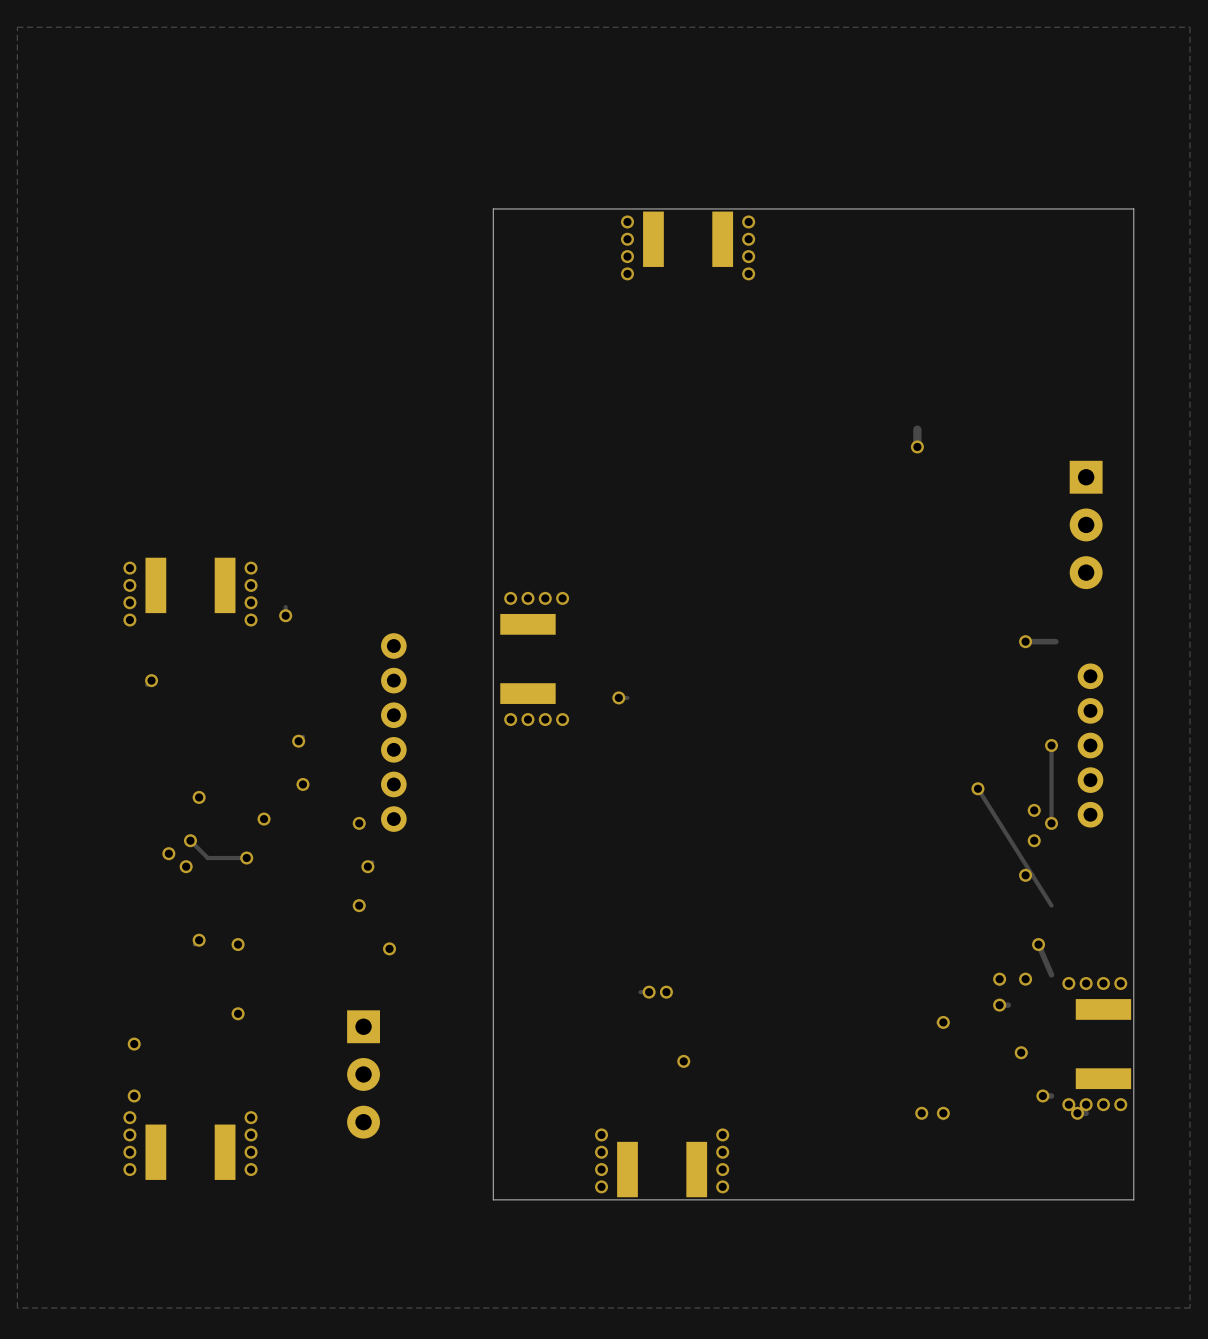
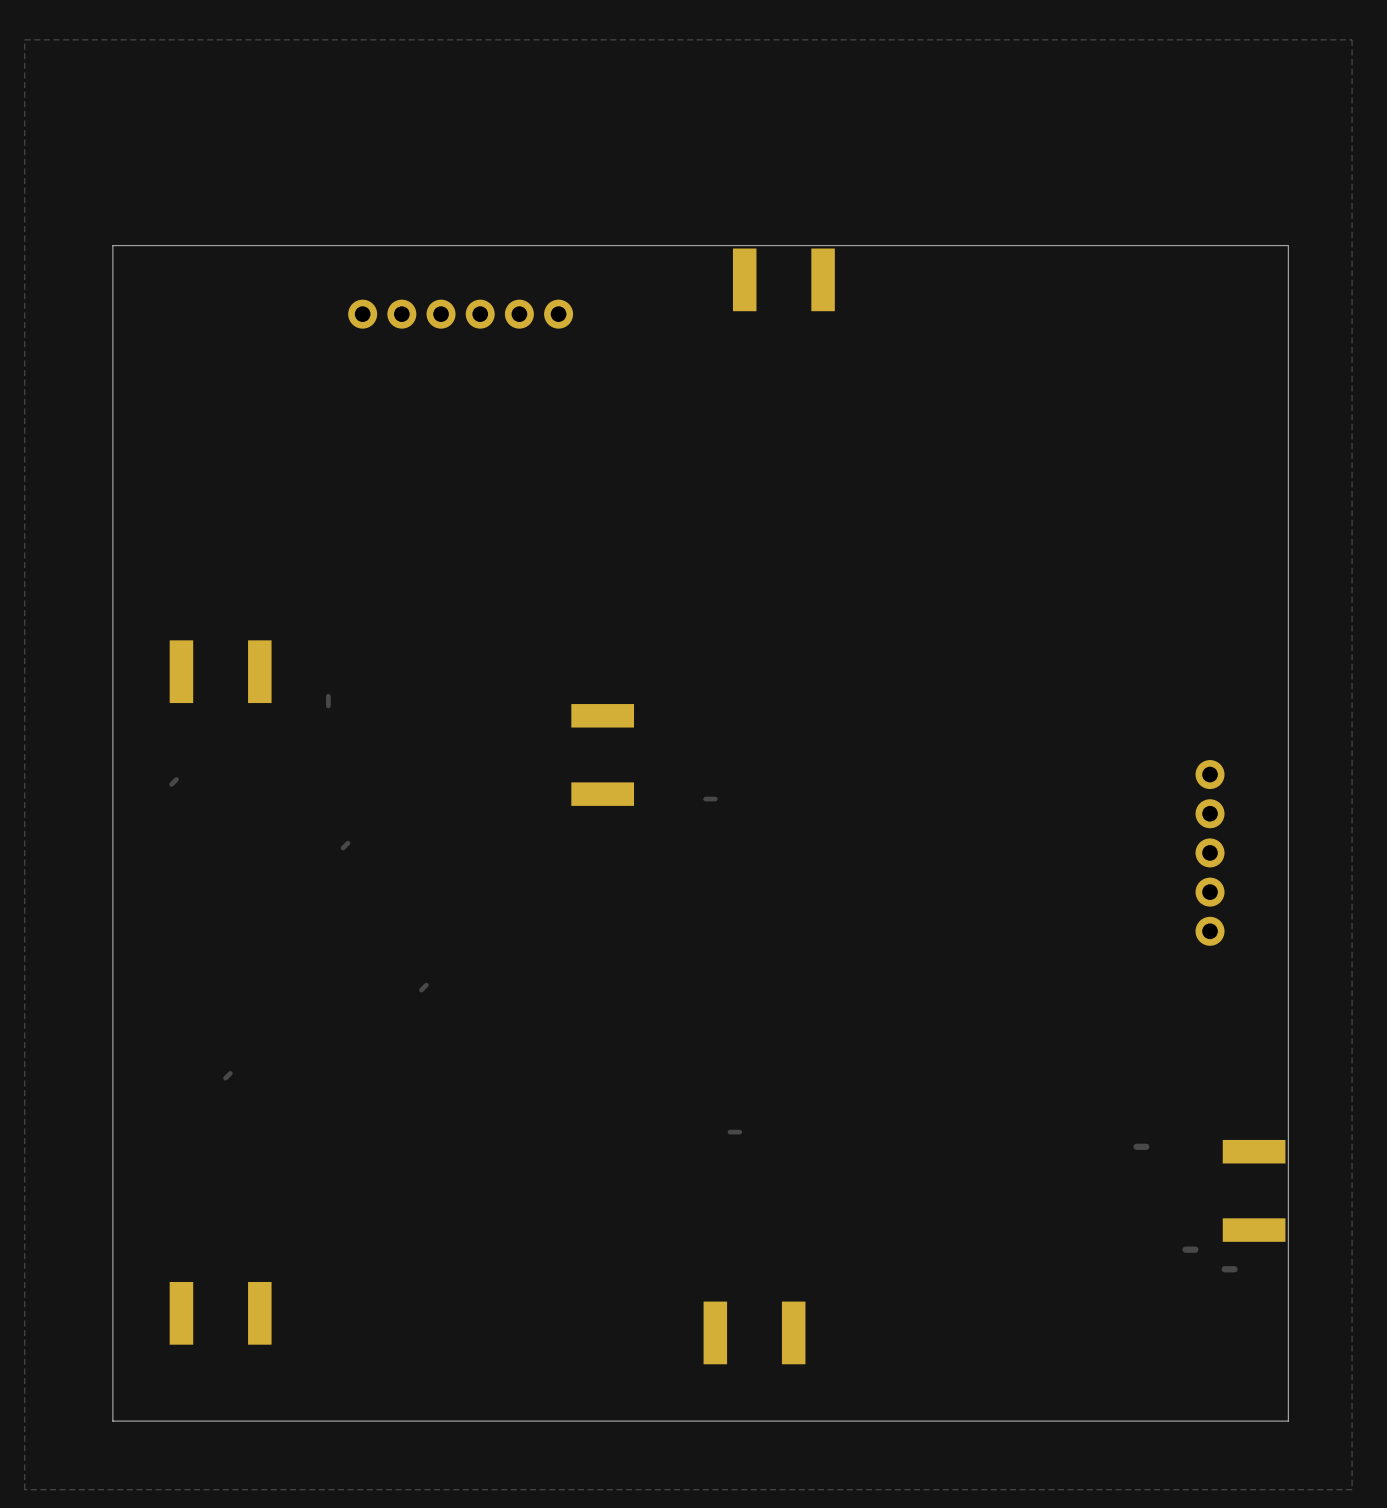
board edge: (493, 208) (493, 1199) (1133, 1199) -> (563, 245) (112, 245) (112, 1421) (1288, 1421) (1288, 1367)
via: (627, 221) -> none
via: (748, 221) -> none
via: (627, 239) -> none
via: (748, 239) -> none
via: (627, 256) -> none
via: (748, 256) -> none
part: none -> (460, 314)
via: (627, 273) -> none
via: (748, 273) -> none
track: (917, 429) (917, 446) -> none
via: (917, 446) -> none
part: (1086, 524) -> none
via: (129, 568) -> none
via: (251, 568) -> none
via: (129, 585) -> none
via: (251, 585) -> none
via: (510, 598) -> none
via: (527, 598) -> none
via: (545, 598) -> none
via: (562, 598) -> none
via: (129, 602) -> none
via: (251, 602) -> none
via: (285, 615) -> none
via: (129, 620) -> none
via: (251, 620) -> none
via: (1025, 641) -> none
track: (1055, 641) (1025, 641) -> none
via: (151, 680) -> none
via: (618, 697) -> none
via: (510, 719) -> none
via: (527, 719) -> none
via: (545, 719) -> none
via: (562, 719) -> none
part: (393, 732) -> none
via: (298, 741) -> none
track: (1051, 745) (1051, 823) -> none
via: (1051, 745) -> none
part position: (1090, 745) -> (1210, 852)
via: (302, 784) -> none
track: (977, 788) (1051, 905) -> none
via: (977, 788) -> none
via: (199, 797) -> none
via: (1034, 810) -> none
via: (264, 819) -> none
via: (359, 823) -> none
via: (1051, 823) -> none
track: (190, 840) (207, 858) (246, 858) -> none
via: (190, 840) -> none
via: (1034, 840) -> none
via: (168, 853) -> none
via: (246, 858) -> none
via: (186, 866) -> none
via: (367, 866) -> none
via: (1025, 875) -> none
via: (359, 905) -> none
via: (199, 940) -> none
via: (238, 944) -> none
track: (1038, 944) (1051, 974) -> none
via: (1038, 944) -> none
via: (389, 948) -> none
via: (999, 979) -> none
via: (1025, 979) -> none
via: (1068, 983) -> none
via: (1086, 983) -> none
via: (1103, 983) -> none
via: (1120, 983) -> none
via: (649, 992) -> none
via: (666, 992) -> none
via: (999, 1005) -> none
via: (238, 1013) -> none
via: (943, 1022) -> none
via: (134, 1044) -> none
via: (1021, 1052) -> none
via: (683, 1061) -> none
part: (363, 1074) -> none
via: (134, 1095) -> none
via: (1042, 1095) -> none
via: (1068, 1104) -> none
via: (1086, 1104) -> none
via: (1103, 1104) -> none
via: (1120, 1104) -> none
via: (921, 1113) -> none
via: (943, 1113) -> none
via: (1077, 1113) -> none
via: (129, 1117) -> none
via: (251, 1117) -> none
via: (129, 1134) -> none
via: (251, 1134) -> none
via: (601, 1134) -> none
via: (722, 1134) -> none
via: (129, 1152) -> none
via: (251, 1152) -> none
via: (601, 1152) -> none
via: (722, 1152) -> none
via: (129, 1169) -> none
via: (251, 1169) -> none
via: (601, 1169) -> none
via: (722, 1169) -> none
via: (601, 1186) -> none
via: (722, 1186) -> none

